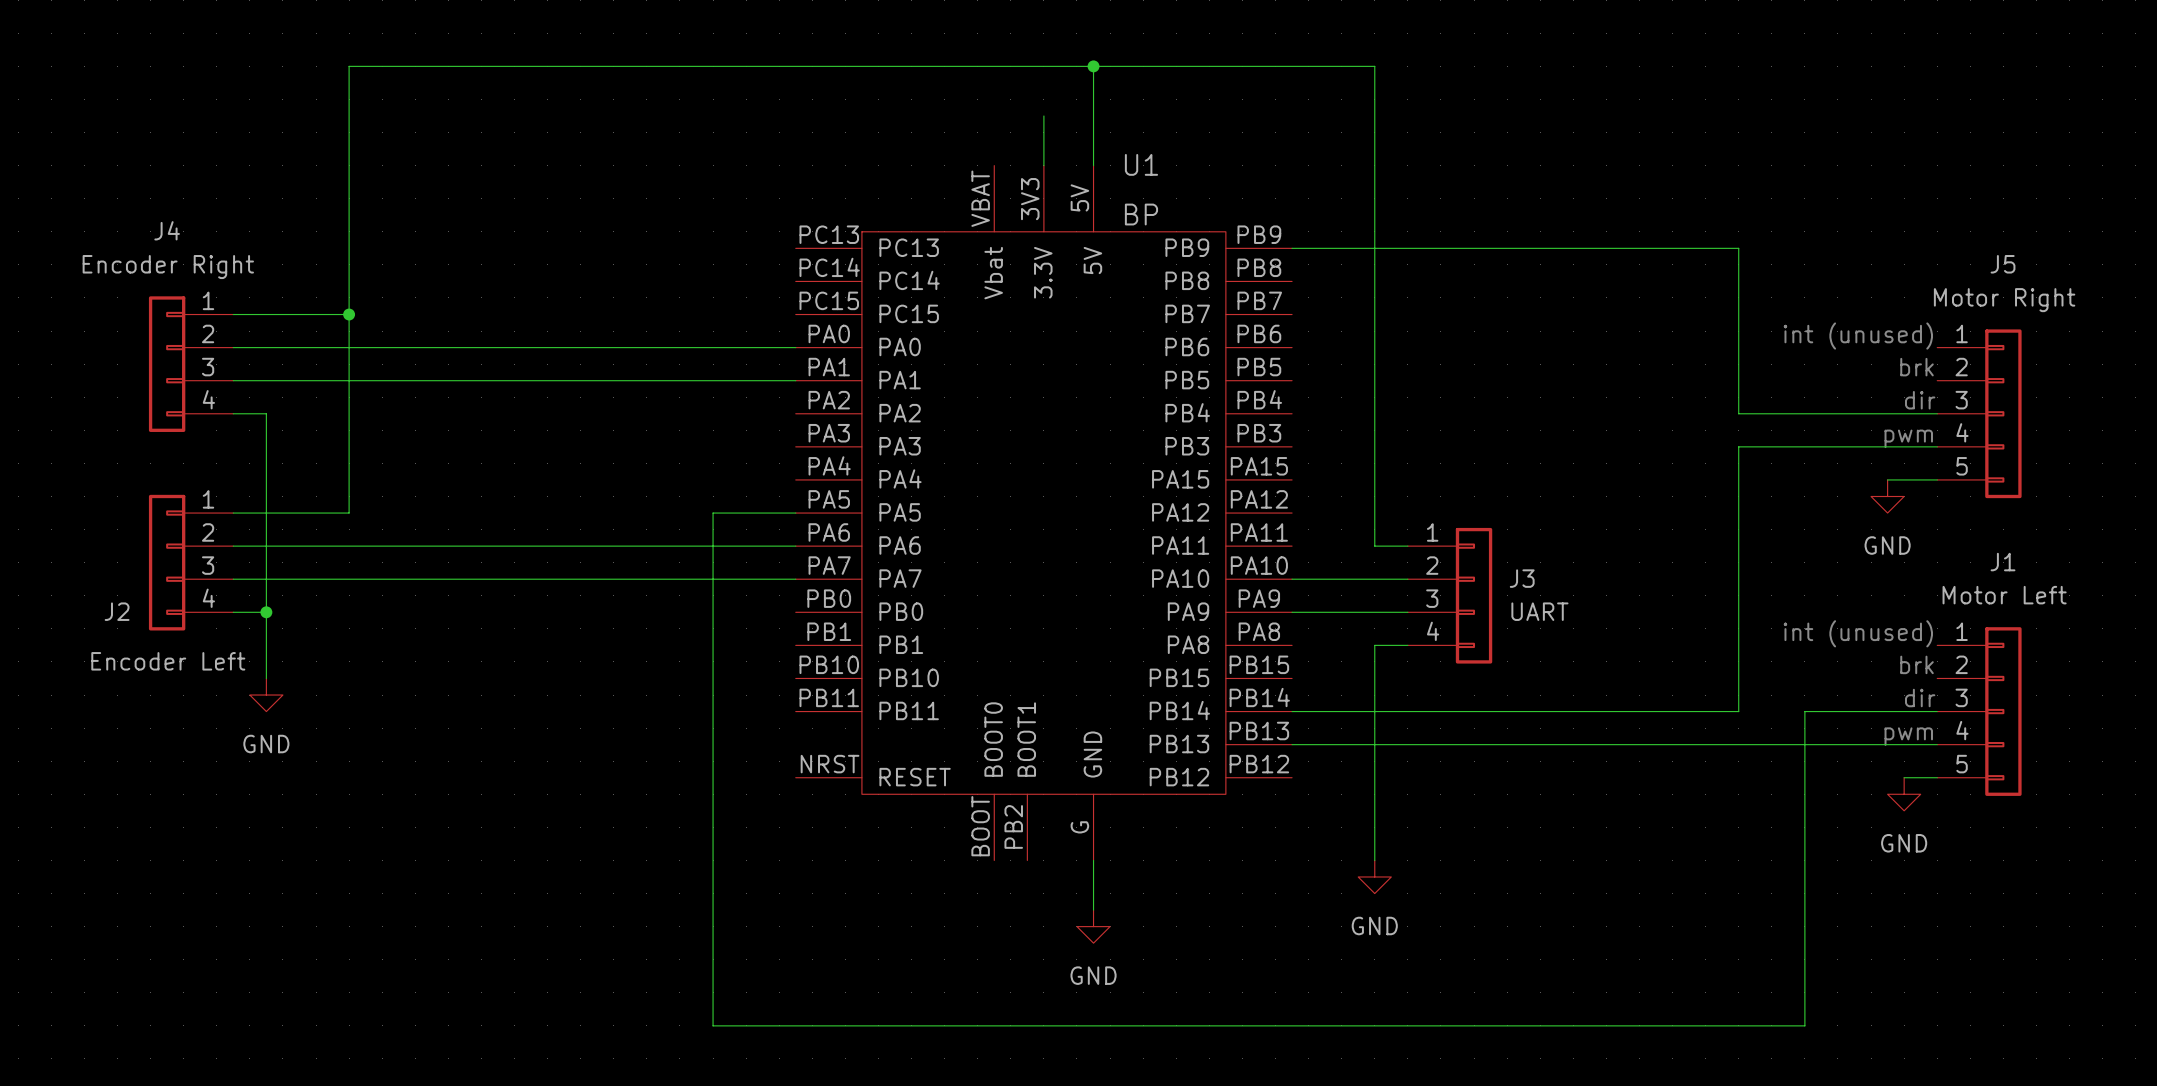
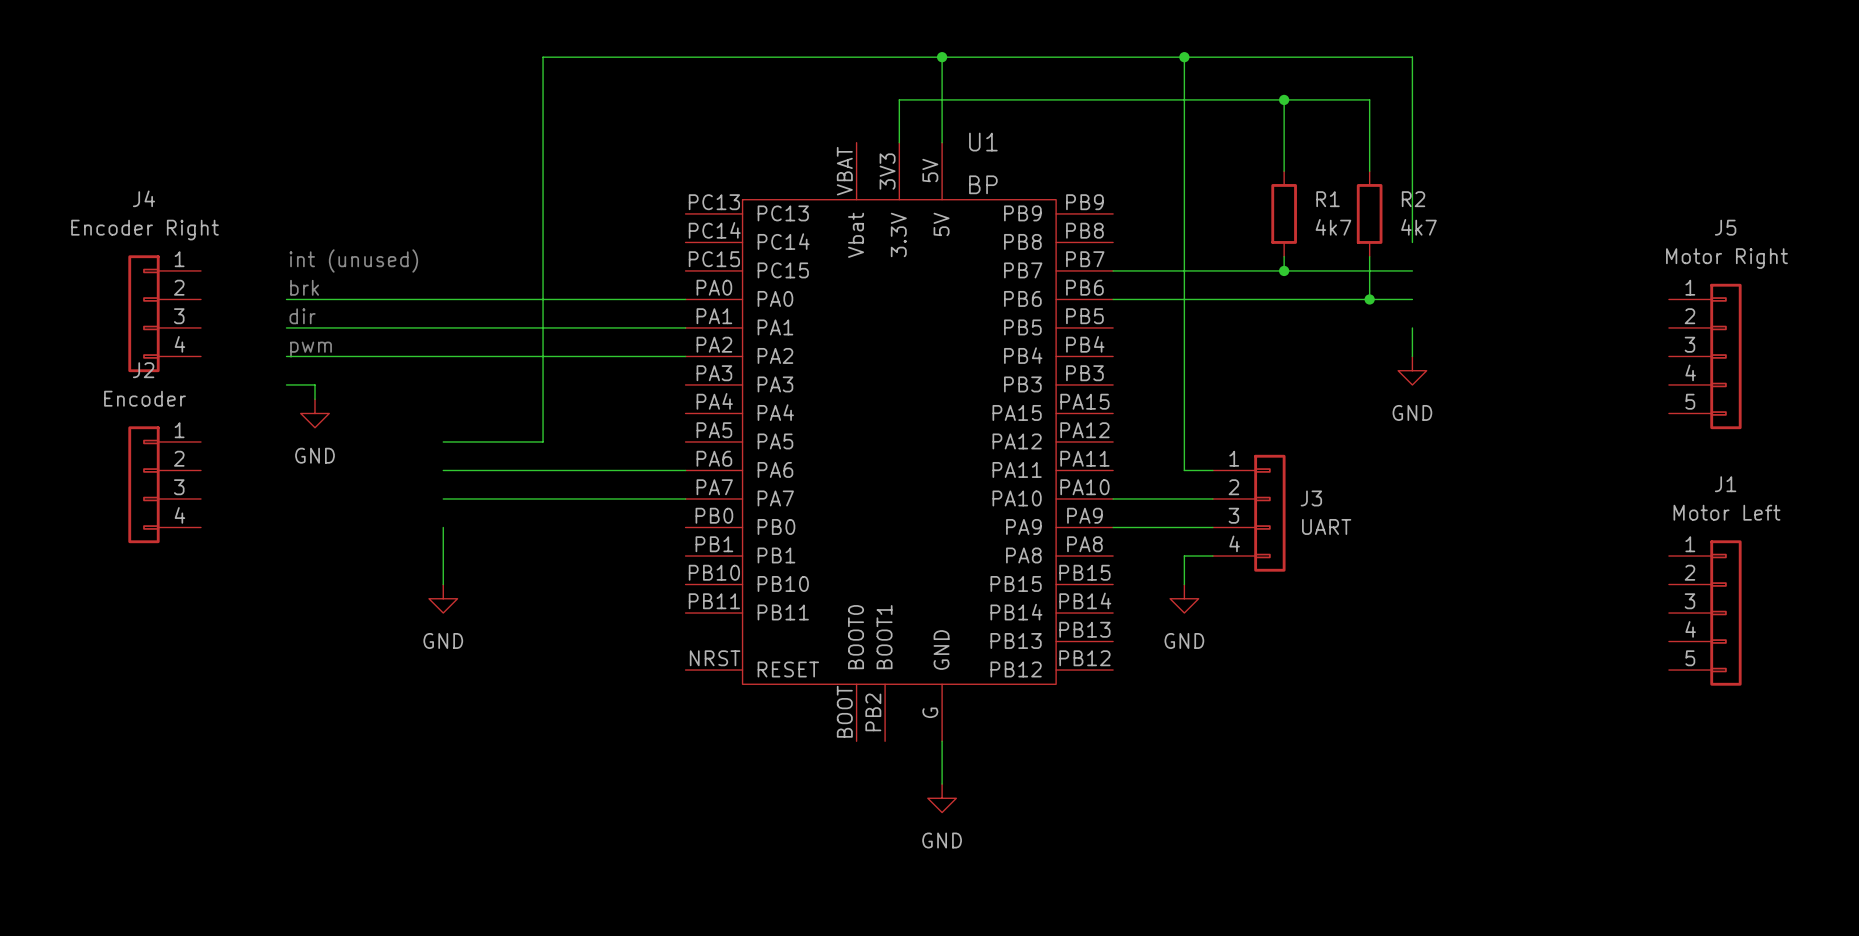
wire: (630, 66) (349, 66) (349, 513) (233, 513) -> (543, 57) (543, 441) (443, 441)
wire: none -> (1184, 57) (1412, 57) (1412, 242)
junction: none -> (1184, 57)
wire: none -> (899, 99) (1369, 99) (1369, 171)
wire: none -> (1284, 99) (1284, 171)
junction: none -> (1284, 99)
wire: (1292, 248) (1738, 248) (1738, 413) (1937, 413) -> none
R1: none -> 4k7 (1284, 213)
R2: none -> 4k7 (1369, 213)
wire: none -> (1284, 256) (1284, 270)
wire: none -> (1369, 256) (1369, 299)
text: none -> int (unused) (353, 260)
wire: (233, 314) (349, 314) -> none
junction: (349, 314) -> none
wire: none -> (1113, 270) (1412, 270)
junction: none -> (1284, 270)
text: none -> brk (304, 287)
text: int (unused) (1858, 336) -> none
wire: (233, 347) (332, 347) -> none
wire: none -> (1113, 299) (1412, 299)
junction: none -> (1369, 299)
text: none -> dir (302, 316)
text: brk (1917, 367) -> none
wire: (233, 380) (332, 380) -> none
wire: none -> (1412, 327) (1412, 356)
text: dir (1920, 400) -> none
text: none -> pwm (311, 349)
wire: (233, 413) (266, 413) (266, 678) -> none
wire: none -> (286, 356) (685, 356)
power symbol: none -> GND (1412, 370)
text: pwm (1908, 438) -> none
wire: none -> (286, 384) (315, 384) (315, 399)
wire: (1937, 446) (1738, 446) (1738, 711) (1292, 711) -> none
power symbol: none -> GND (315, 413)
wire: (1887, 479) (1937, 479) -> none
power symbol: GND (1887, 496) -> none
wire: (795, 513) (713, 513) (713, 1025) (1804, 1025) (1804, 711) (1937, 711) -> none
wire: (233, 546) (514, 546) -> none
wire: (233, 579) (514, 579) -> none
J2 name position: J2 (117, 611) -> J2 (143, 370)
wire: (233, 612) (266, 612) -> none
junction: (266, 612) -> none
wire: none -> (443, 527) (443, 584)
text: int (unused) (1858, 633) -> none
J2 value: Encoder Left (168, 661) -> Encoder (144, 398)
text: brk (1917, 664) -> none
wire: (1374, 678) (1374, 860) -> none
power symbol: GND (266, 695) -> none
power symbol: none -> GND (443, 598)
text: dir (1920, 698) -> none
text: pwm (1908, 736) -> none
wire: (1292, 744) (1937, 744) -> none
wire: (1904, 777) (1937, 777) -> none
power symbol: GND (1904, 794) -> none
power symbol position: GND (1374, 876) -> GND (1184, 598)

